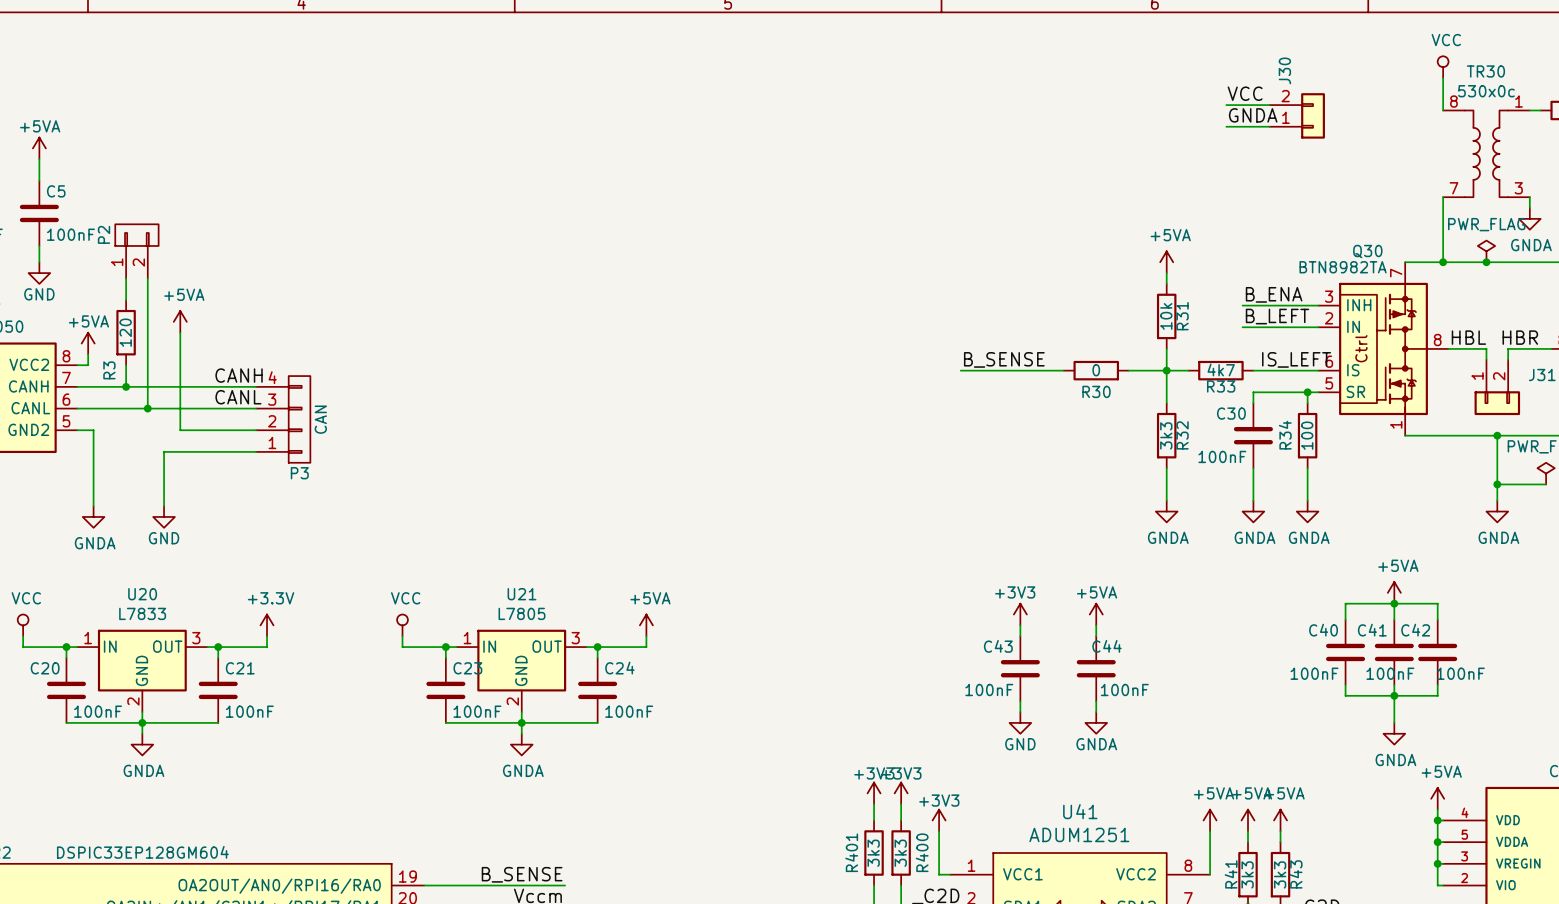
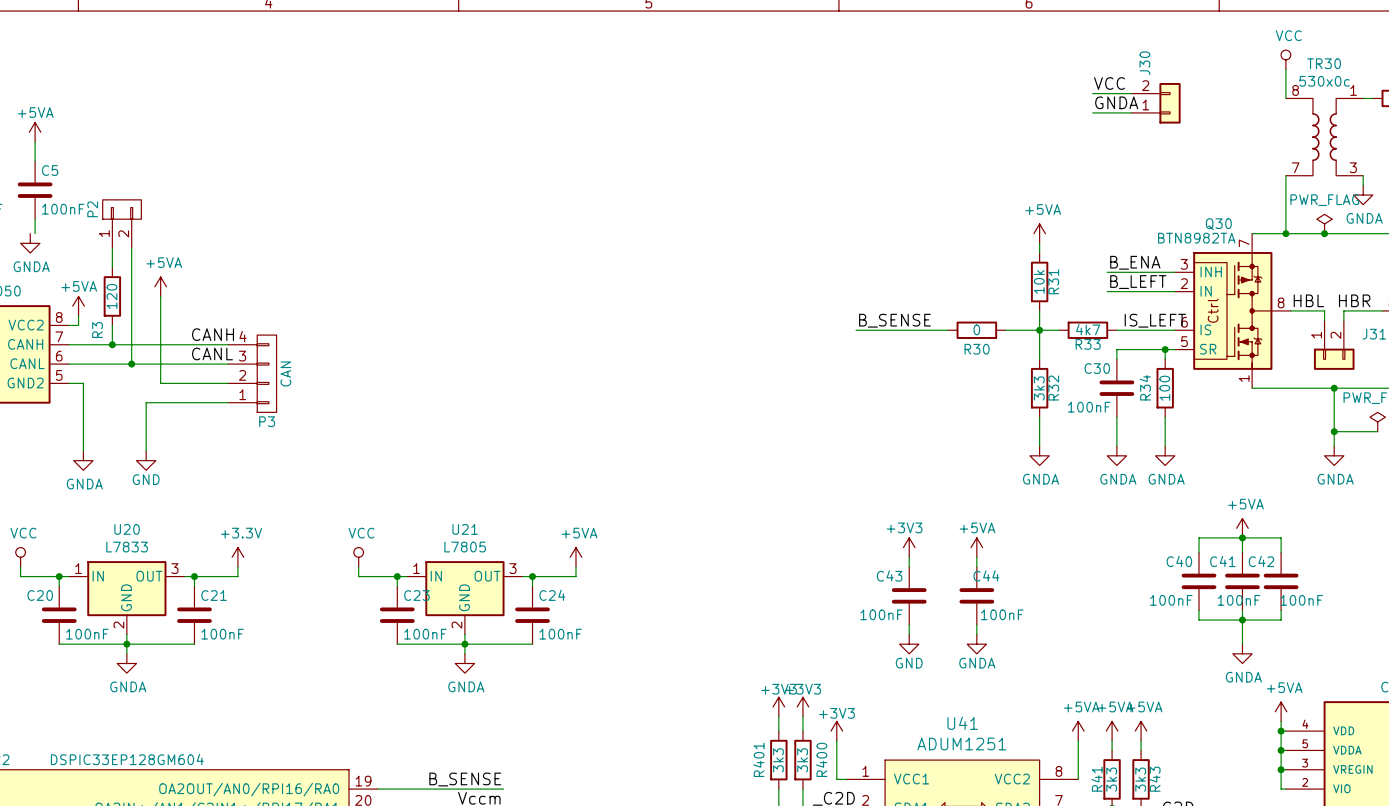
power symbol: GND (39, 273) -> GNDA (30, 243)

